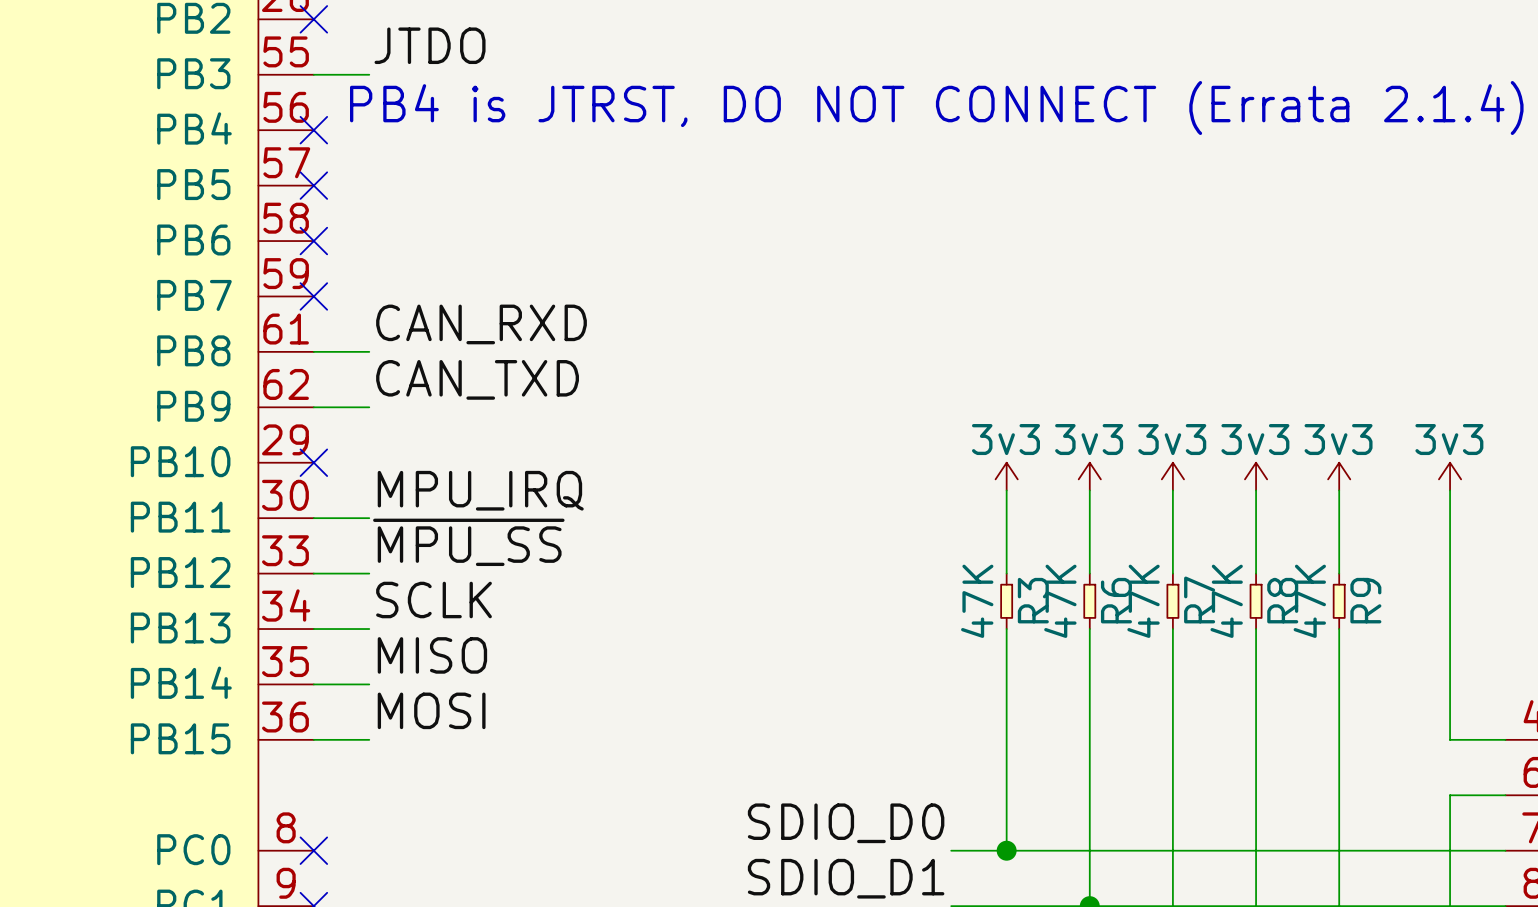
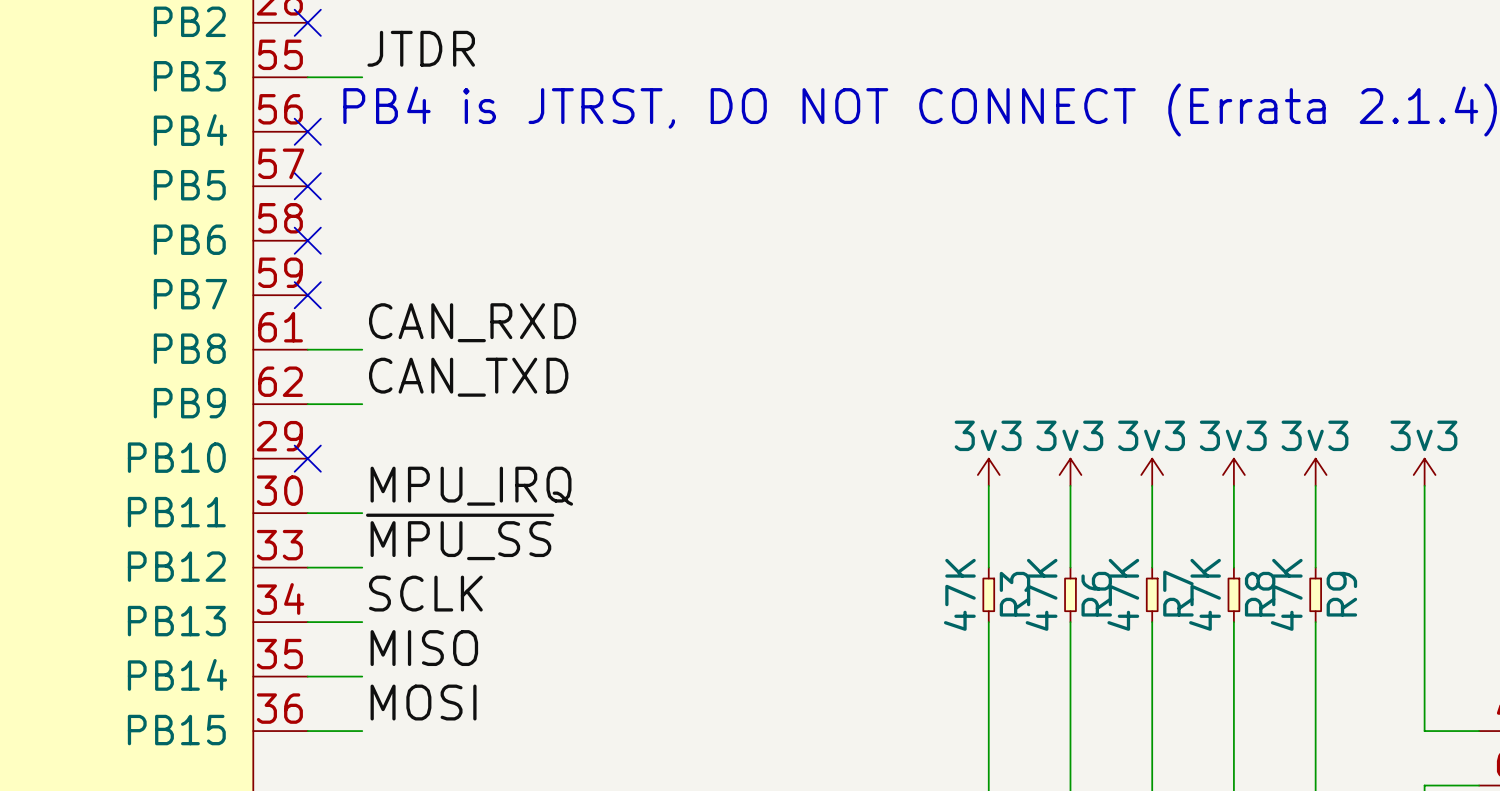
label: JTDO (430, 45) -> JTDR (421, 48)

